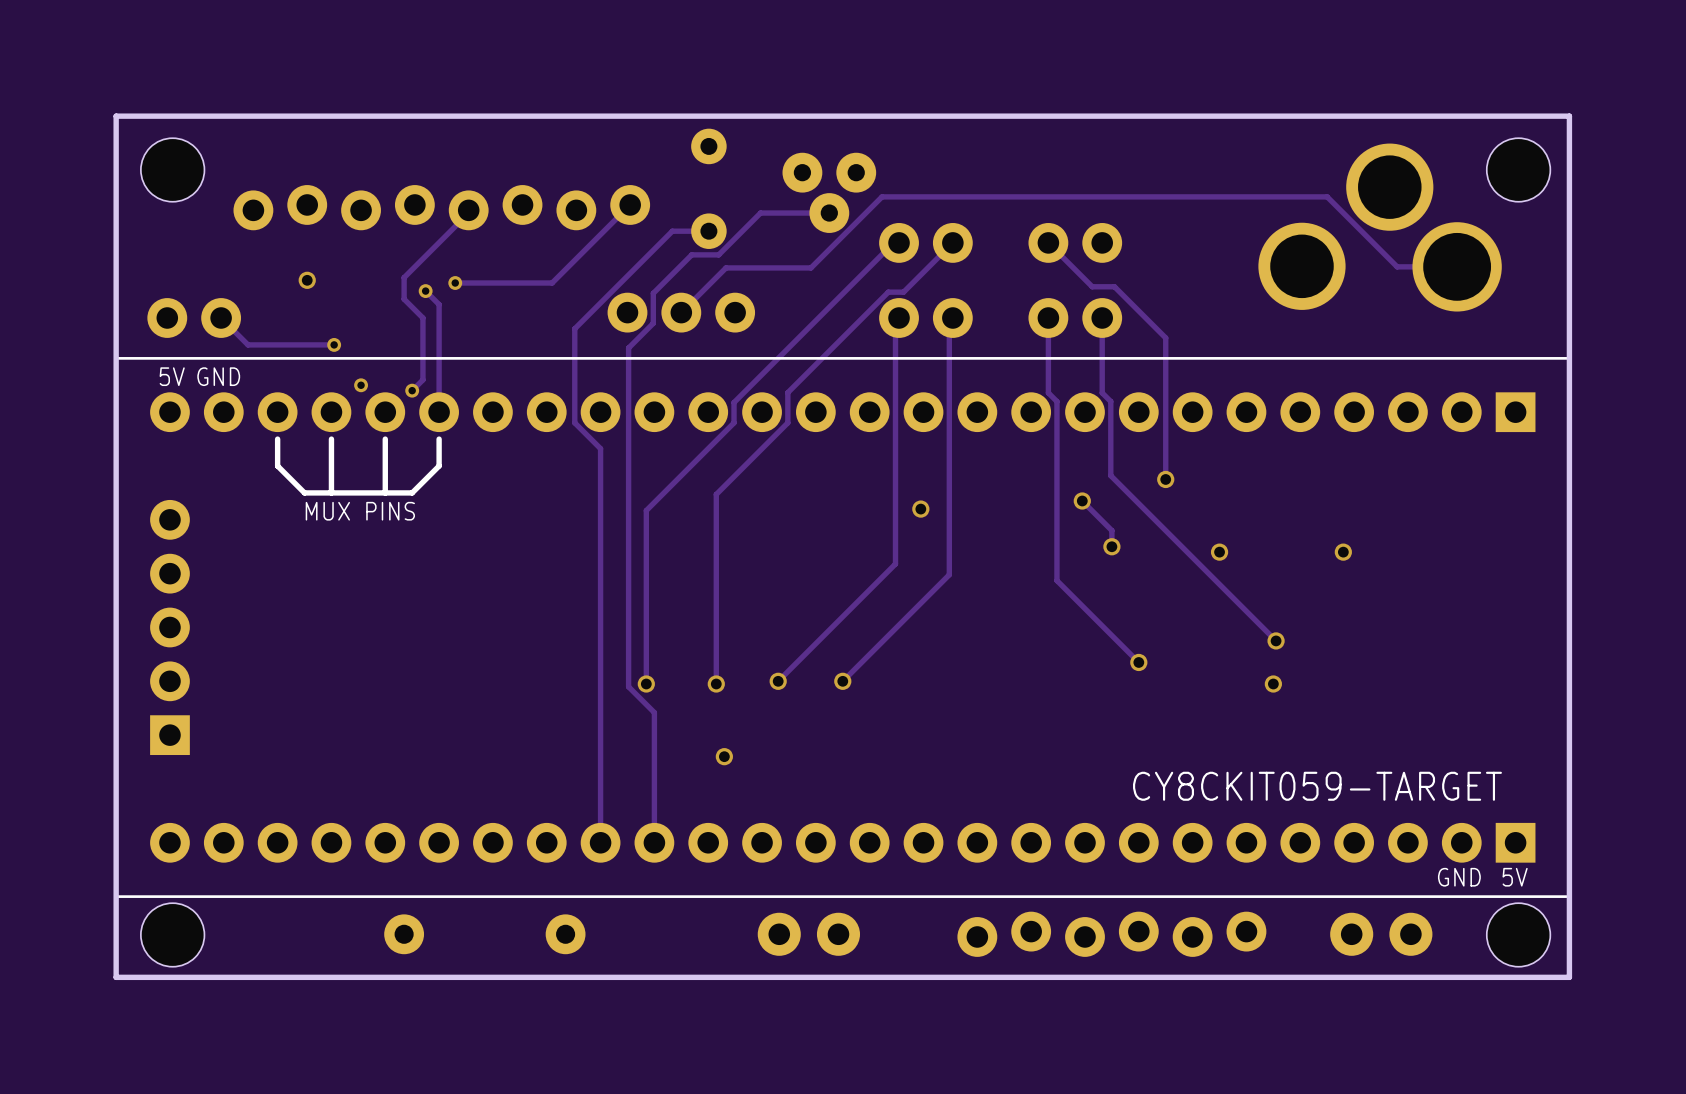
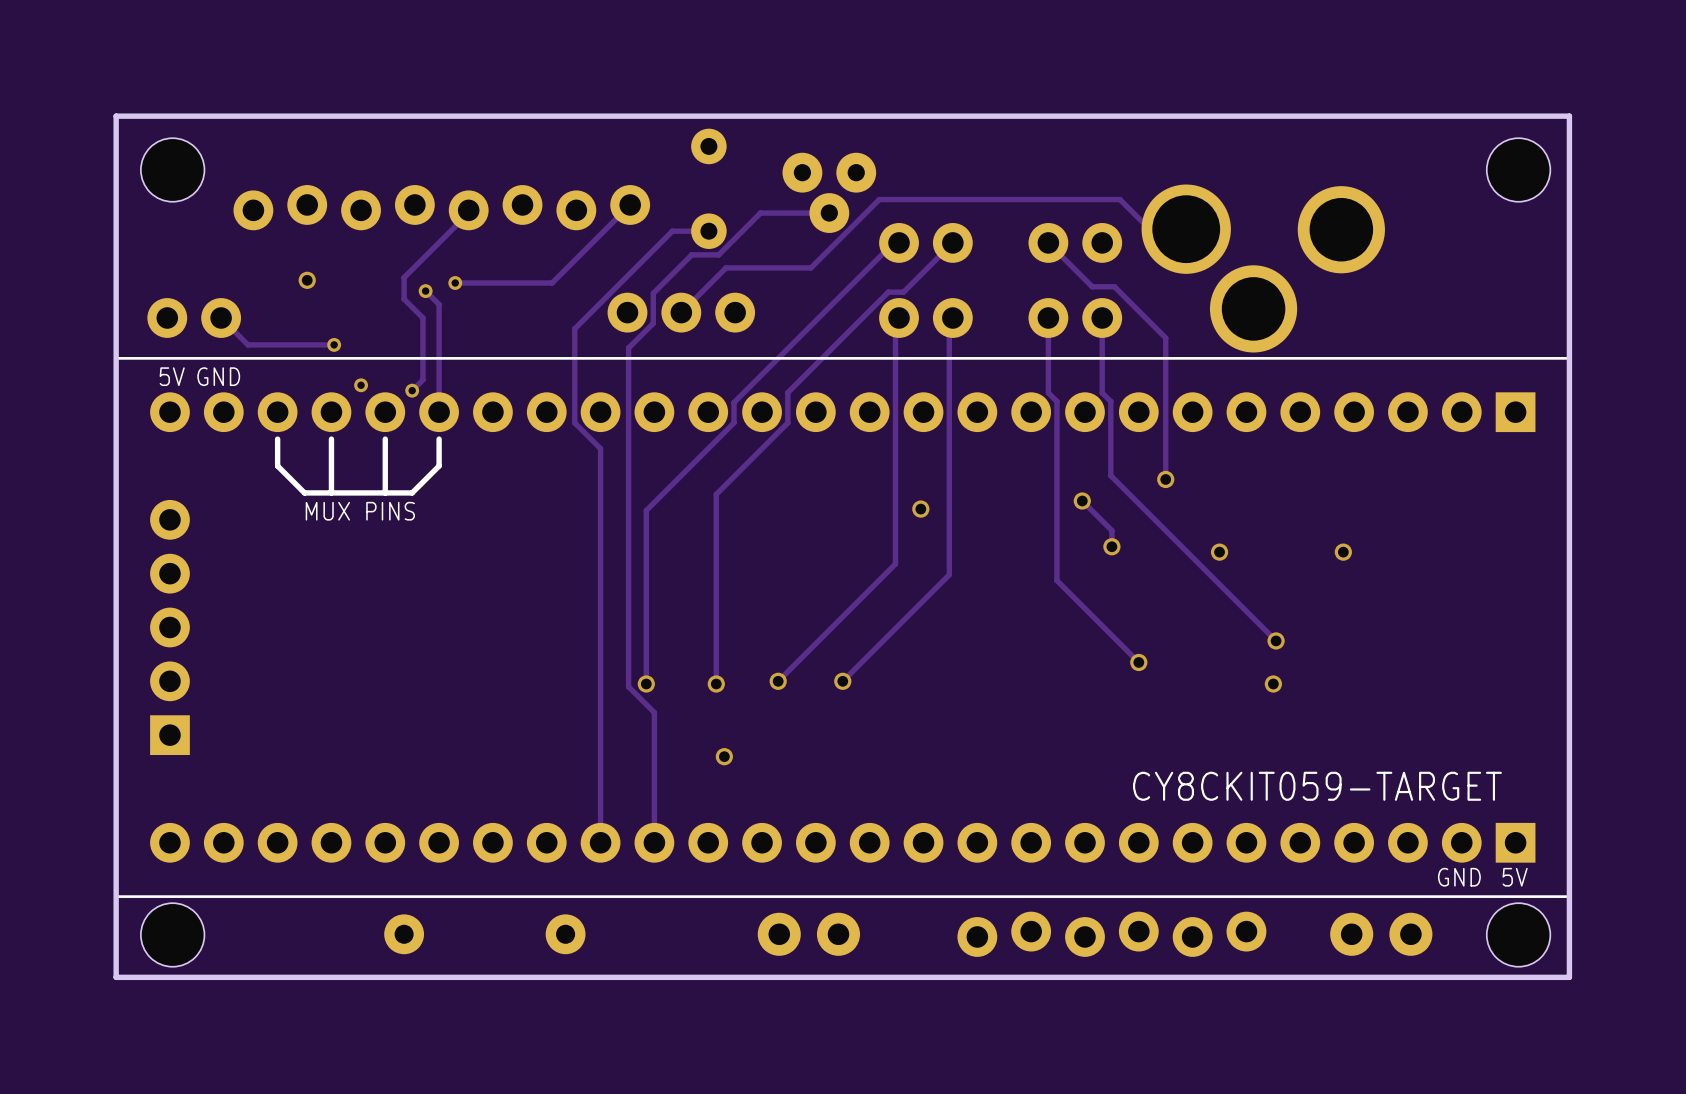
track: (879, 199) (882, 196) (1327, 196) (1397, 266) (1457, 266) -> (879, 199) (1119, 199) (1149, 229) (1186, 229)
part rotation: 0° (1380, 227) -> 180° (1263, 268)

